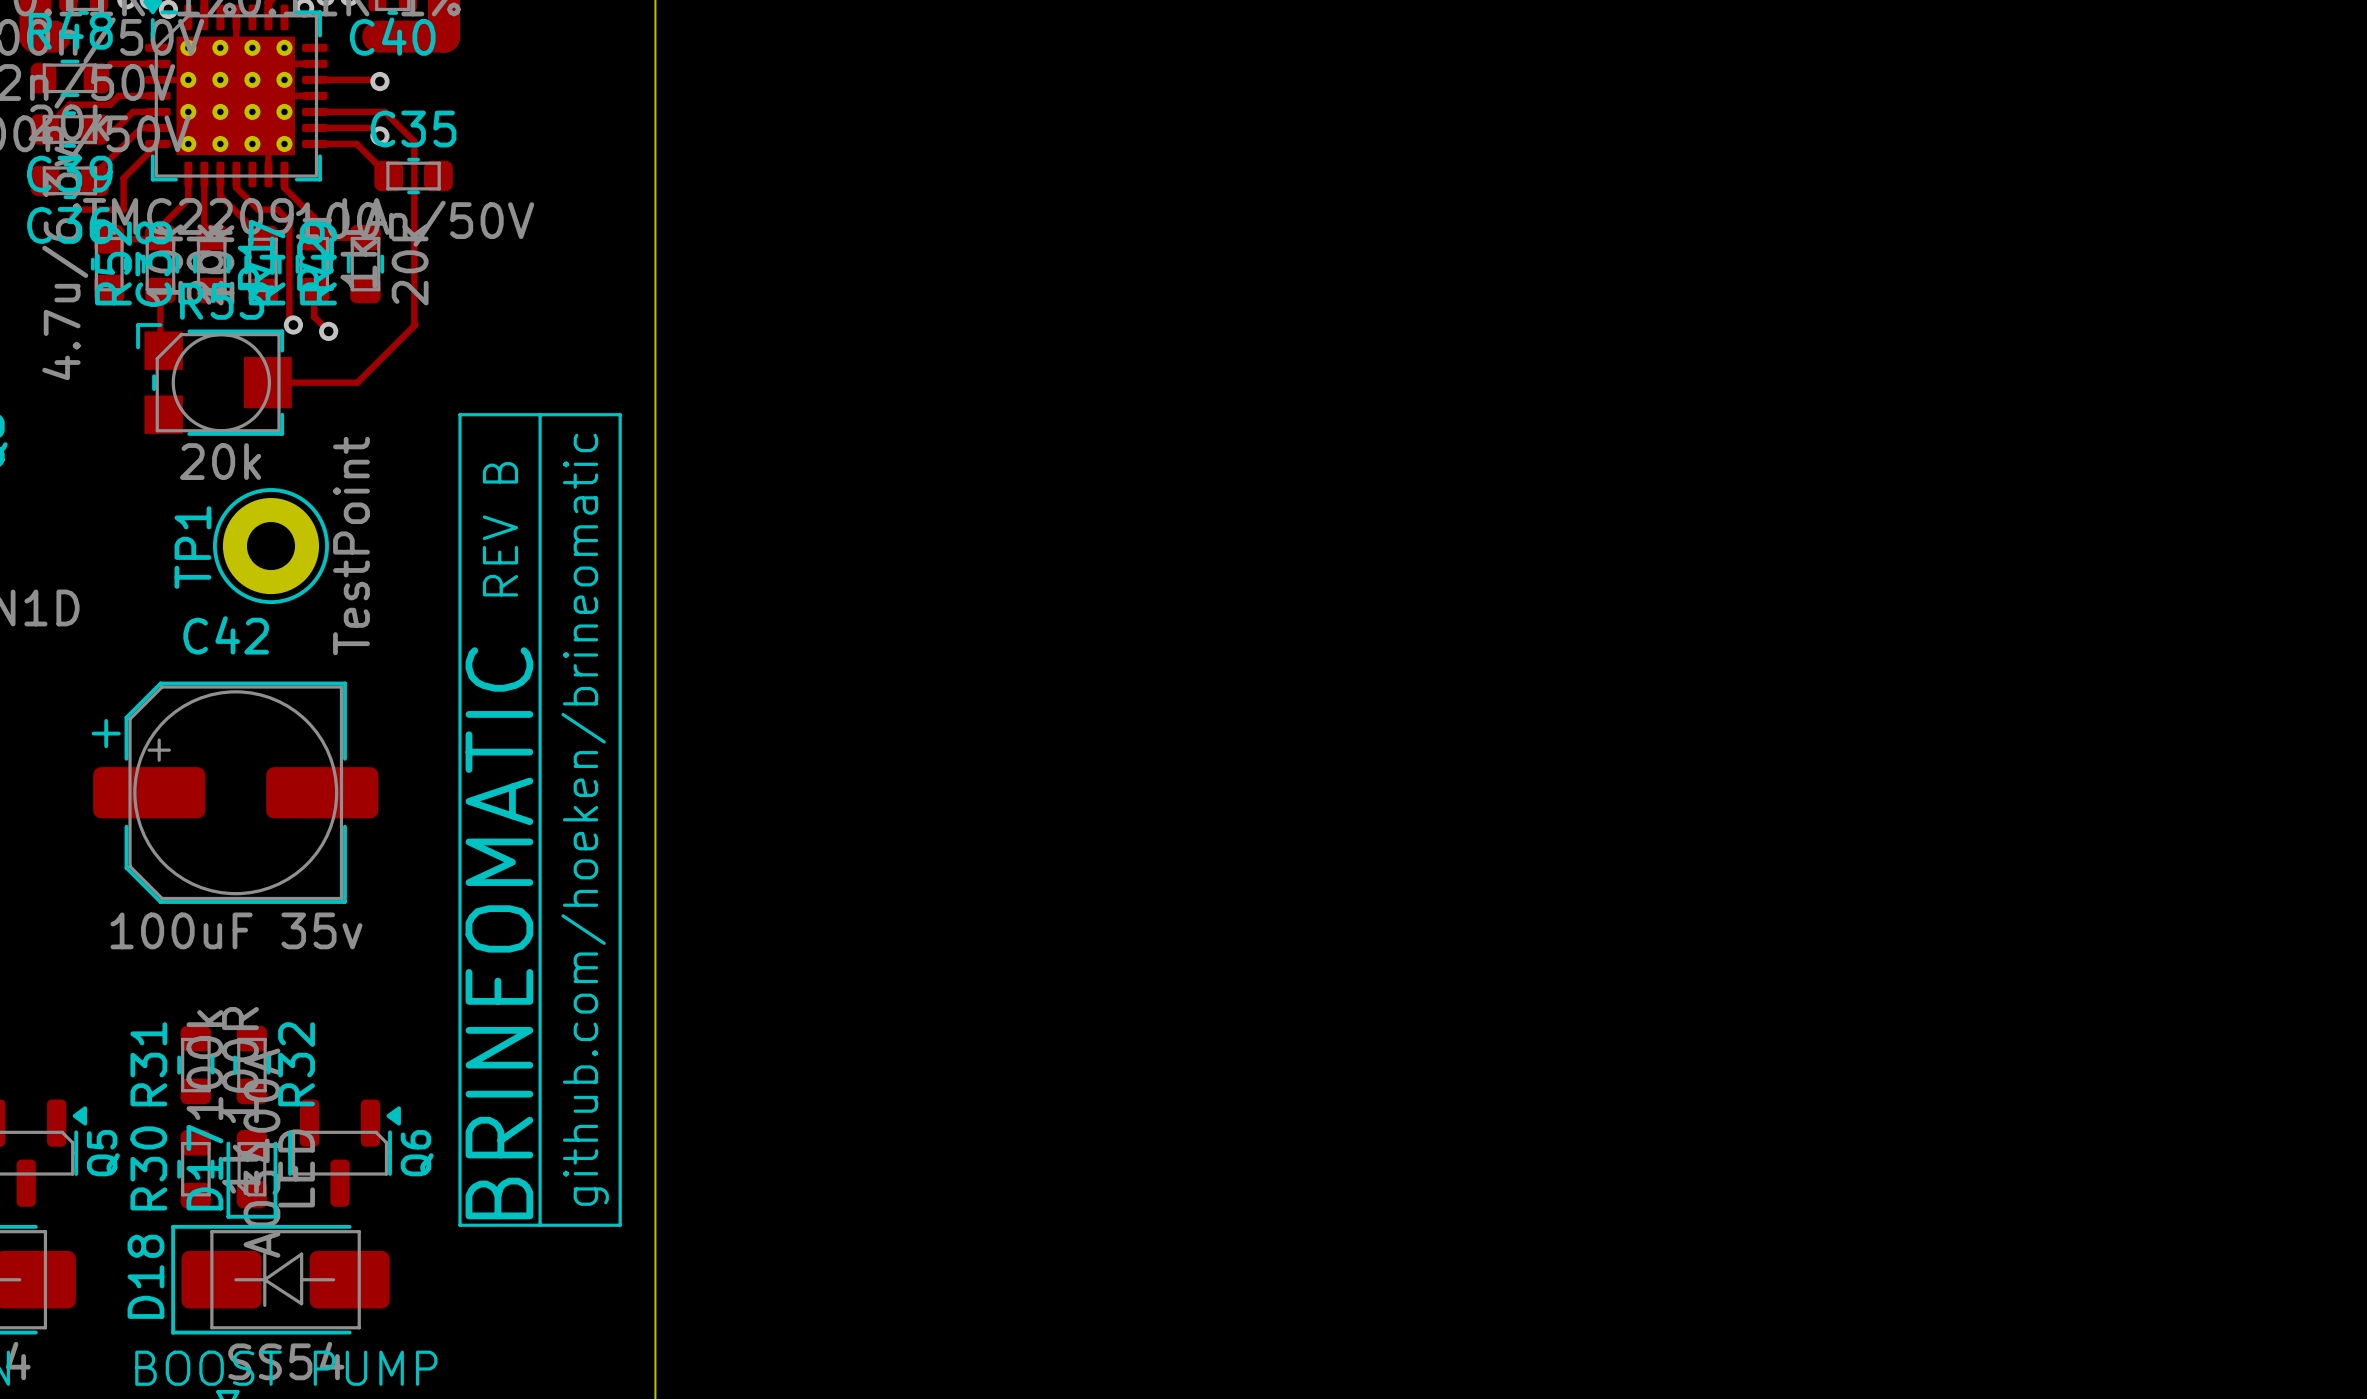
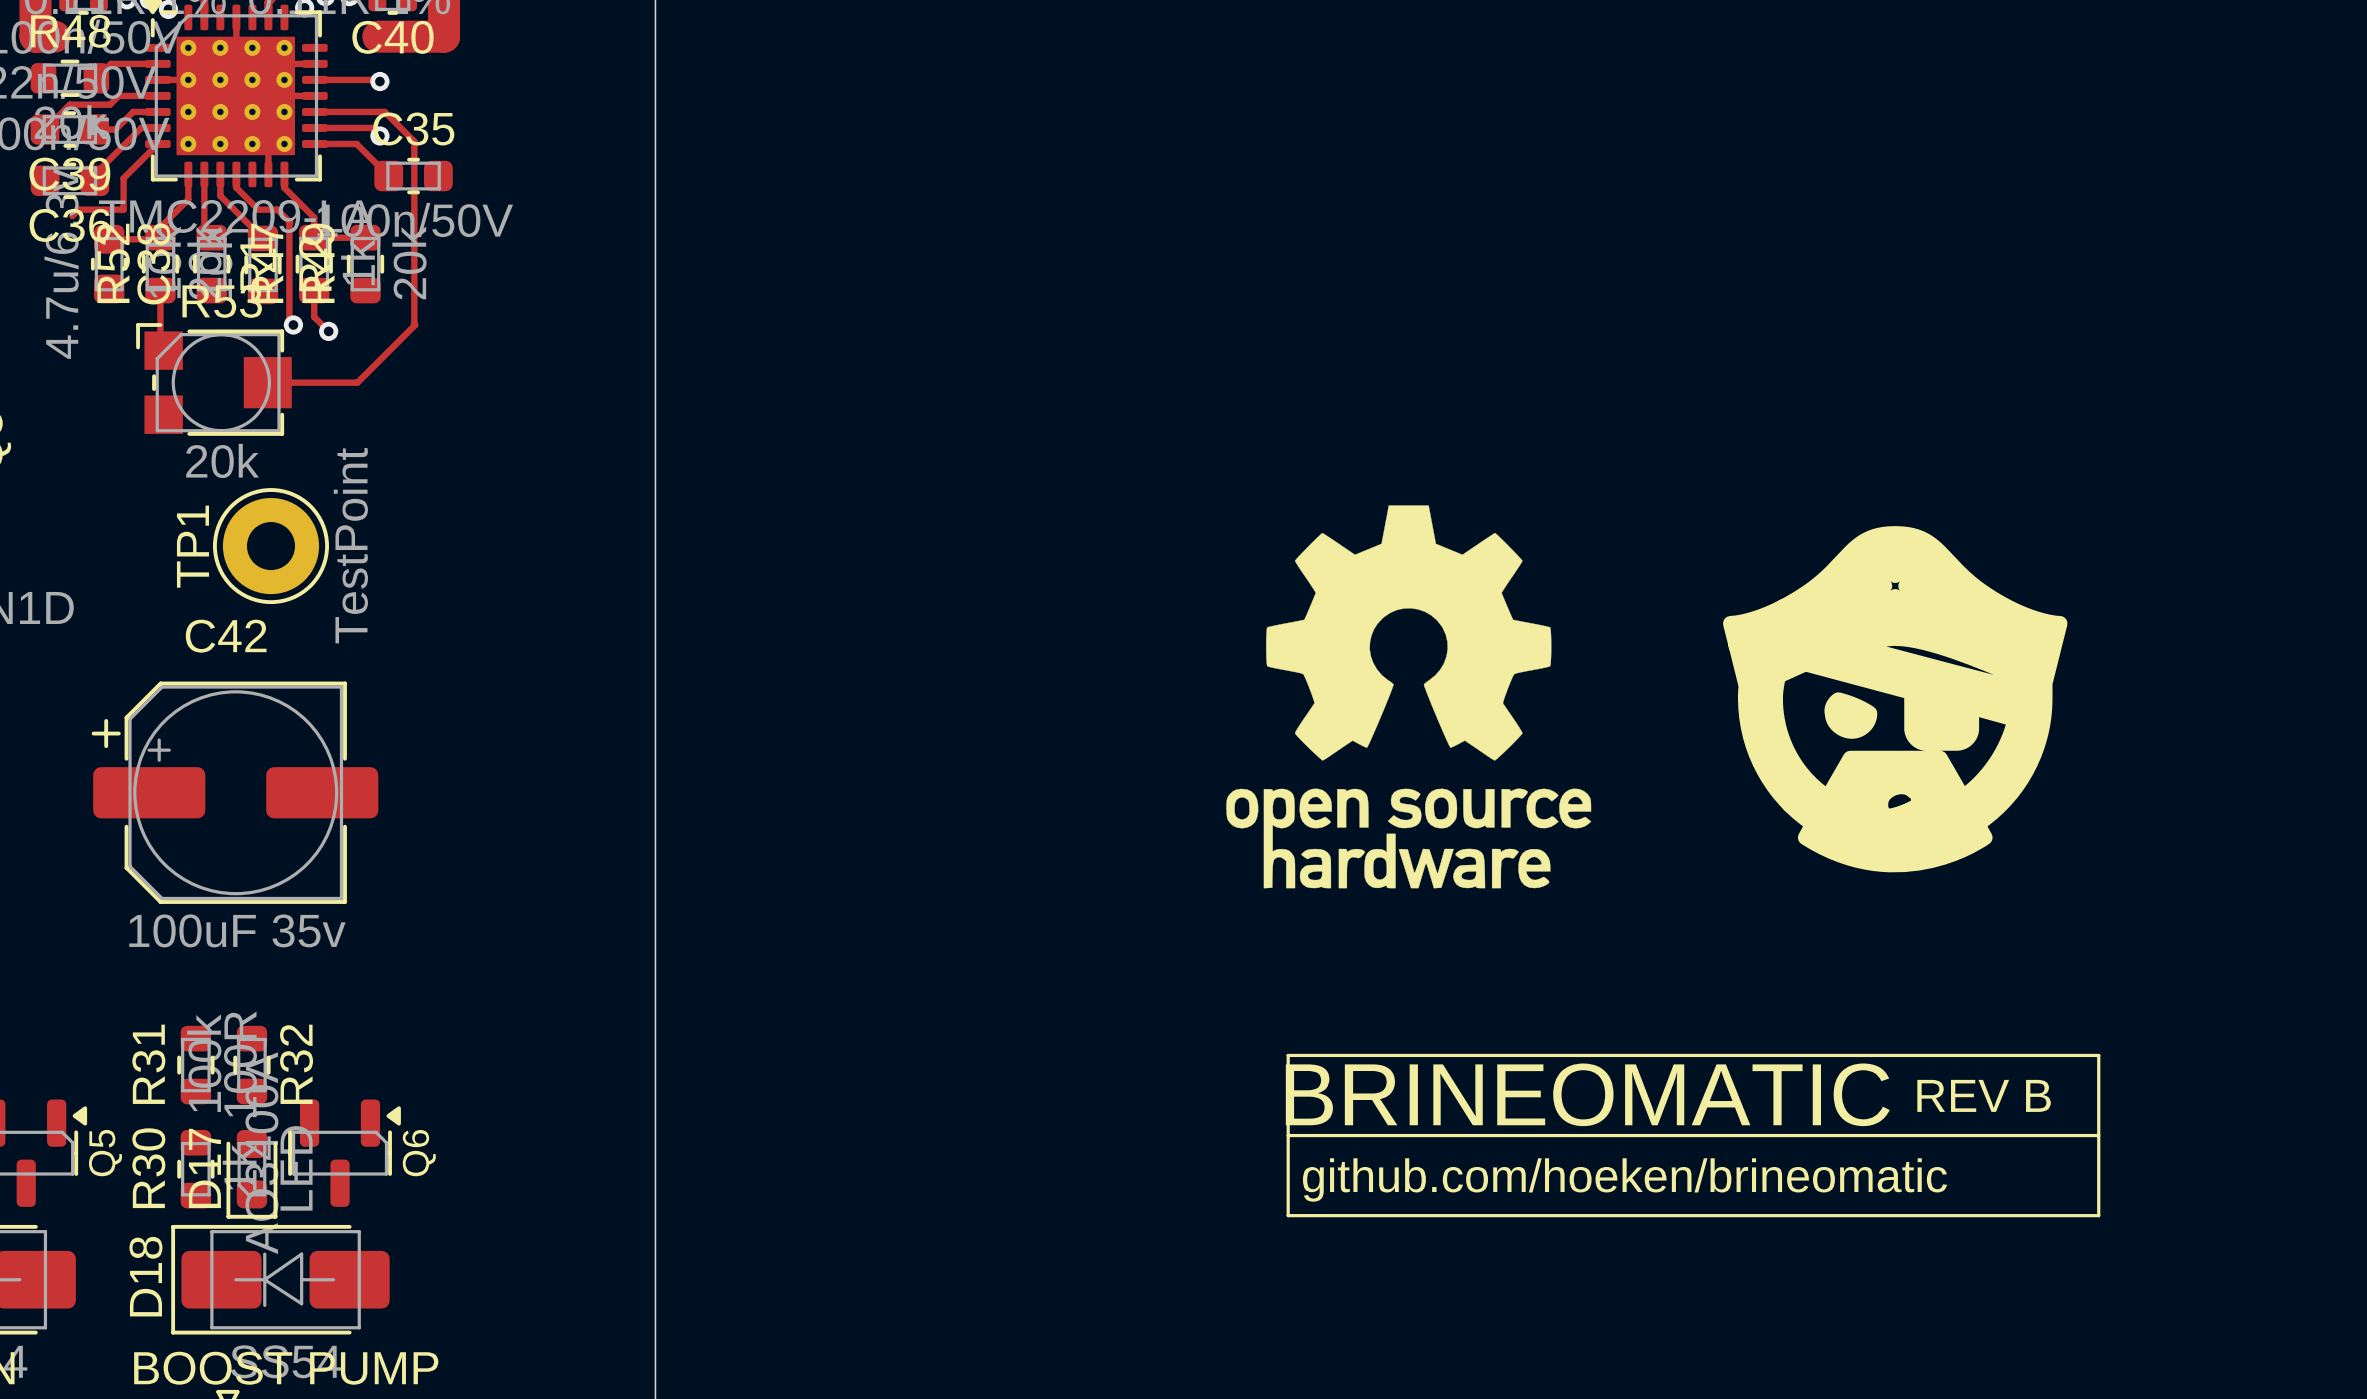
line: (460, 414) (620, 414) (620, 1225) (460, 1225) (460, 414) -> none
line: (540, 414) (540, 1225) -> none
drawing: none -> [1226, 505, 1592, 889]
drawing: none -> [1723, 526, 2068, 873]
text: REV B (500, 529) -> none
text rotation: 0° (585, 819) -> 90° clockwise (1624, 1179)
text position: github.com/hoeken/brineomatic (585, 819) -> github.com/hoeken/brineomatic (1624, 1179)
text rotation: 0° (499, 933) -> 90° clockwise (1587, 1094)
text position: BRINEOMATIC (499, 933) -> BRINEOMATIC (1587, 1094)
line: none -> (1288, 1055) (2098, 1055) (2098, 1215) (1288, 1215) (1288, 1055)
text: none -> REV B (1984, 1095)
line: none -> (1288, 1135) (2098, 1135)

